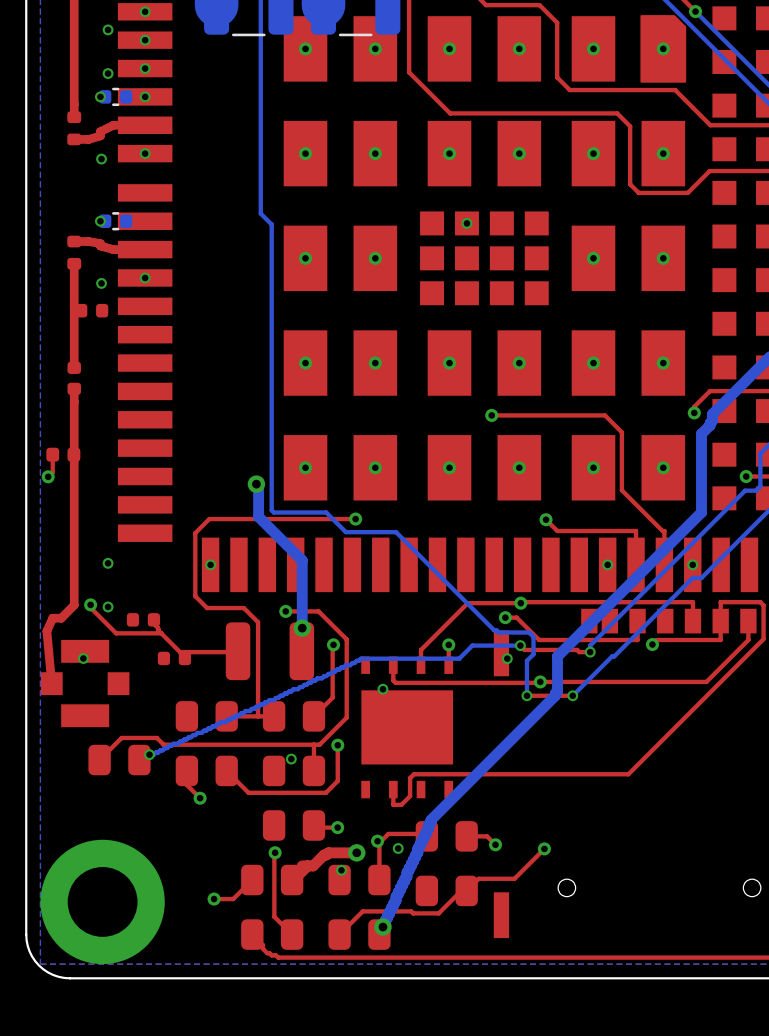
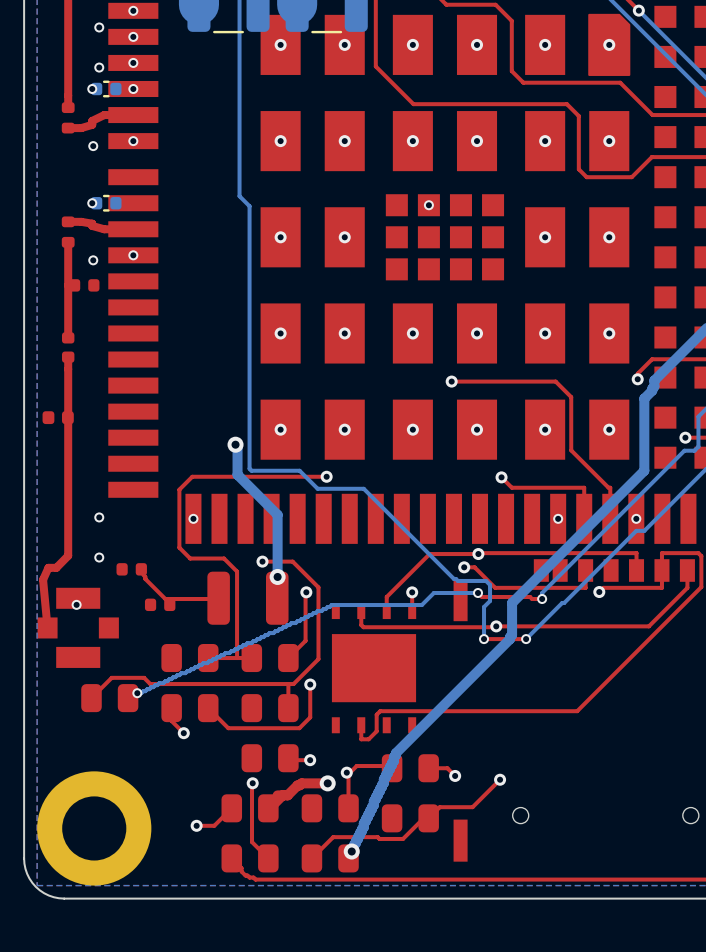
top track: (52, 454) (52, 472) (48, 476) -> none
via: (48, 476) -> none
top track: (90, 604) (90, 607) (116, 633) (161, 633) -> none
via: (90, 604) -> none
via: (507, 658) -> none
via: (382, 689) -> none
via: (291, 759) -> none
via: (398, 848) -> none
via: (341, 870) -> none

